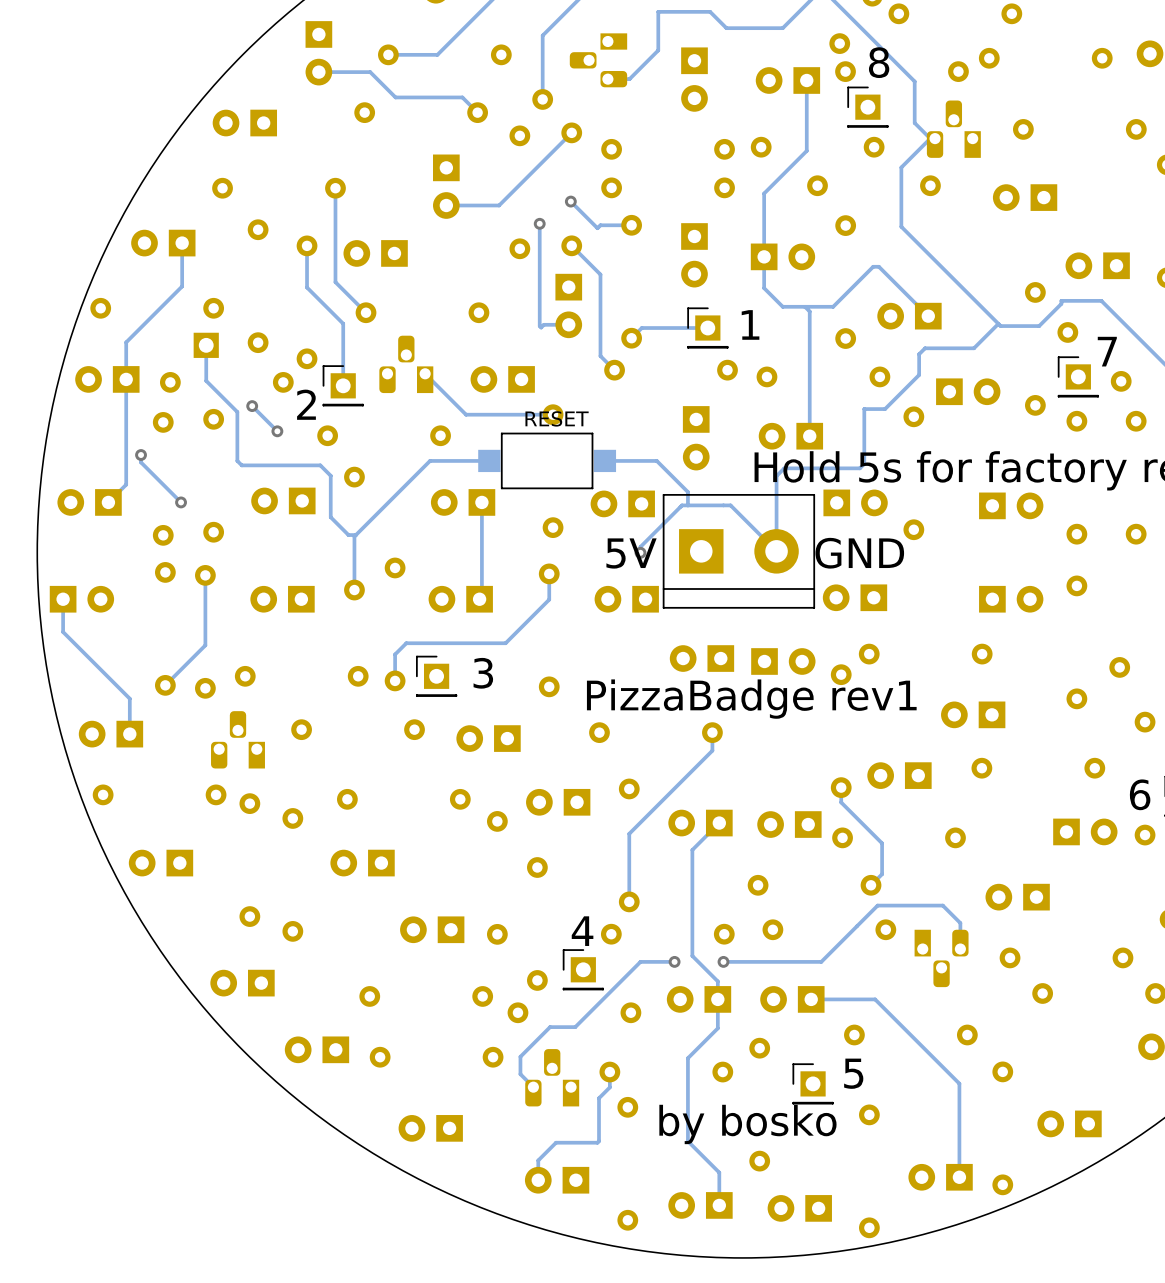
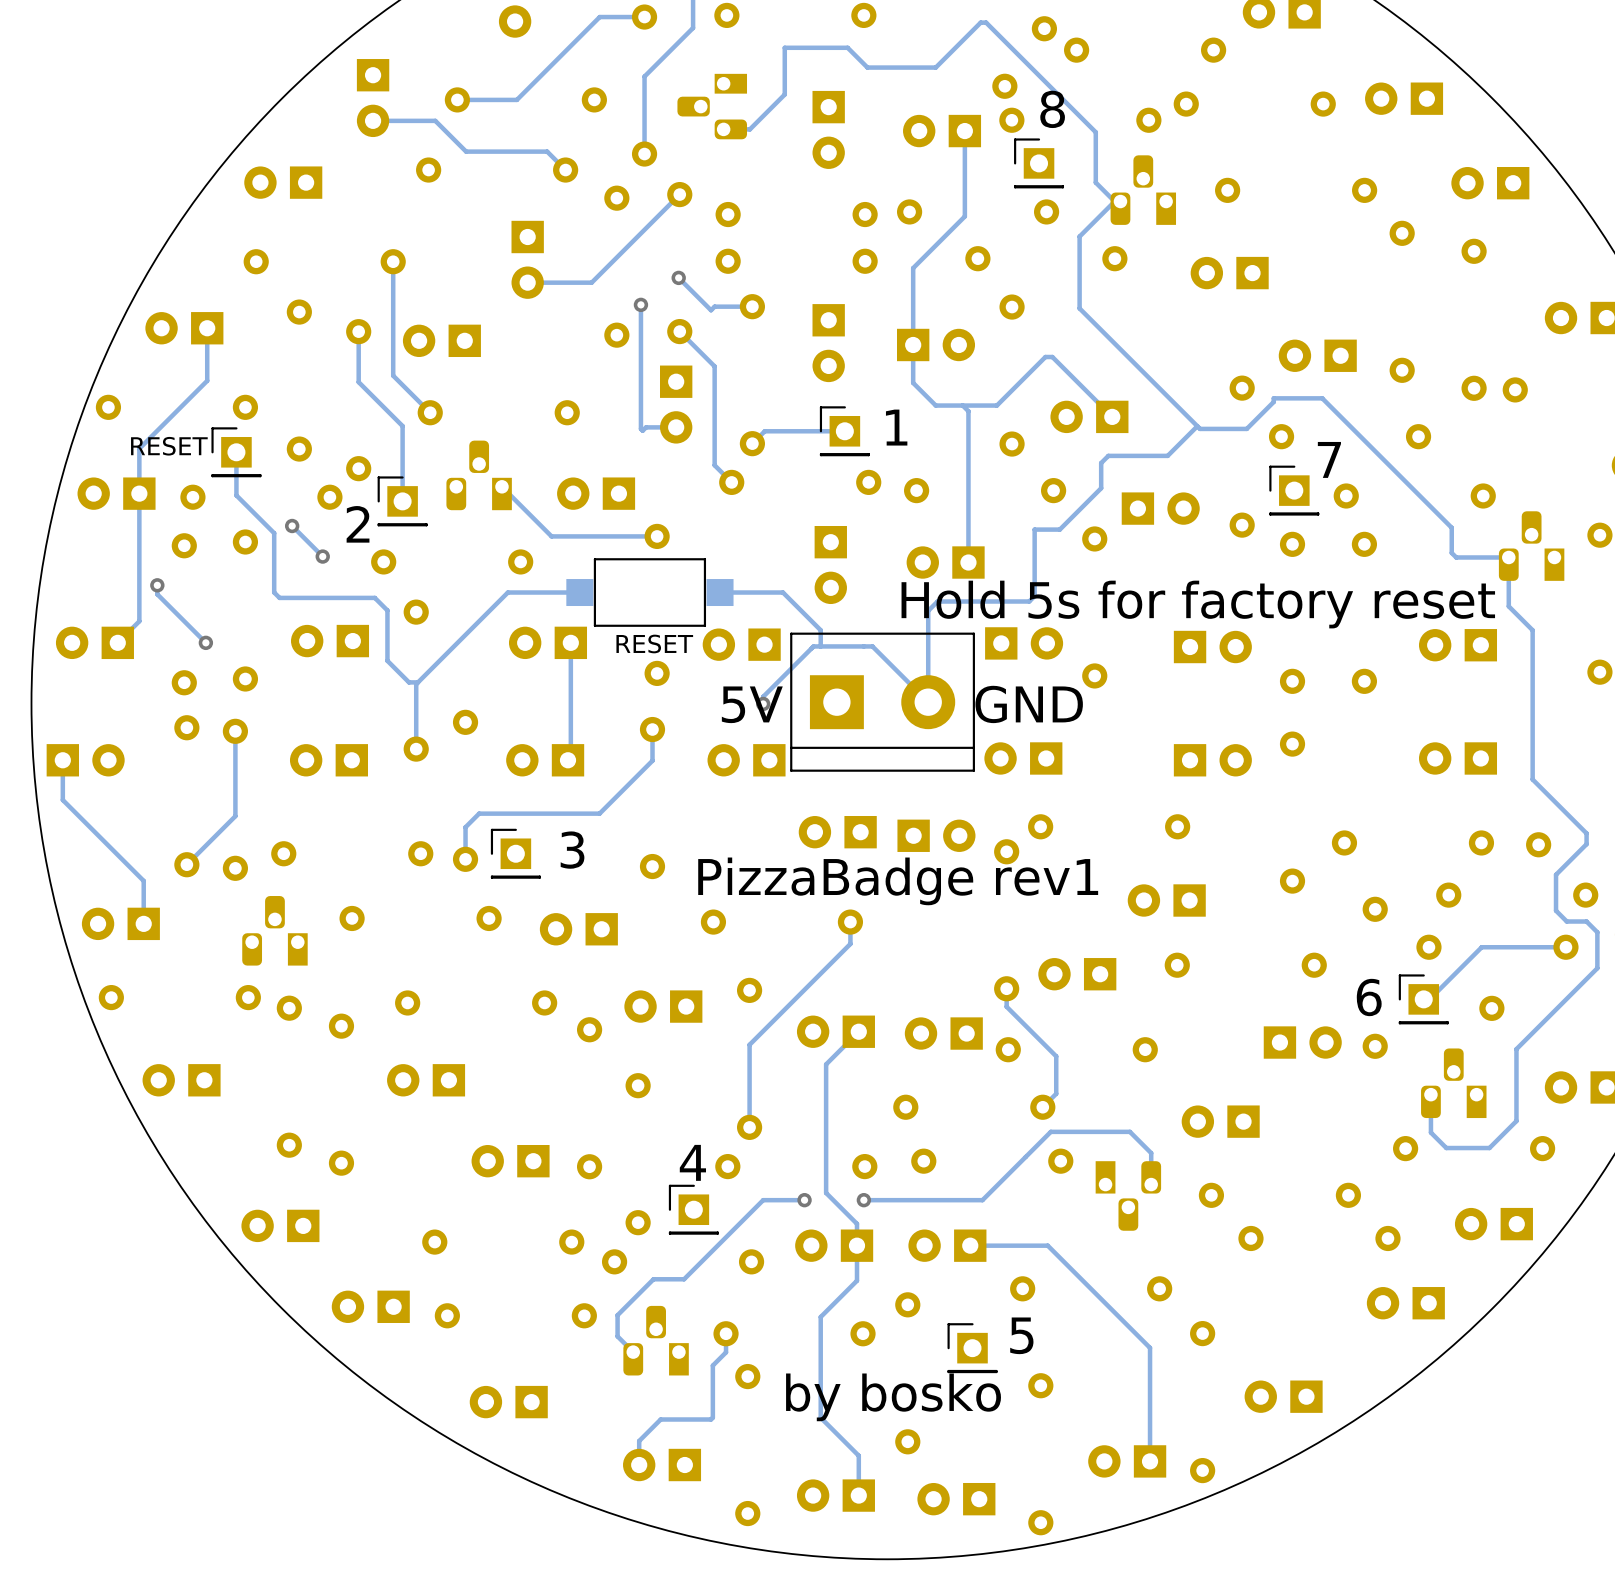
RESET side: top (206, 345) -> bottom (236, 452)
part value position: RESET (557, 418) -> RESET (654, 643)

